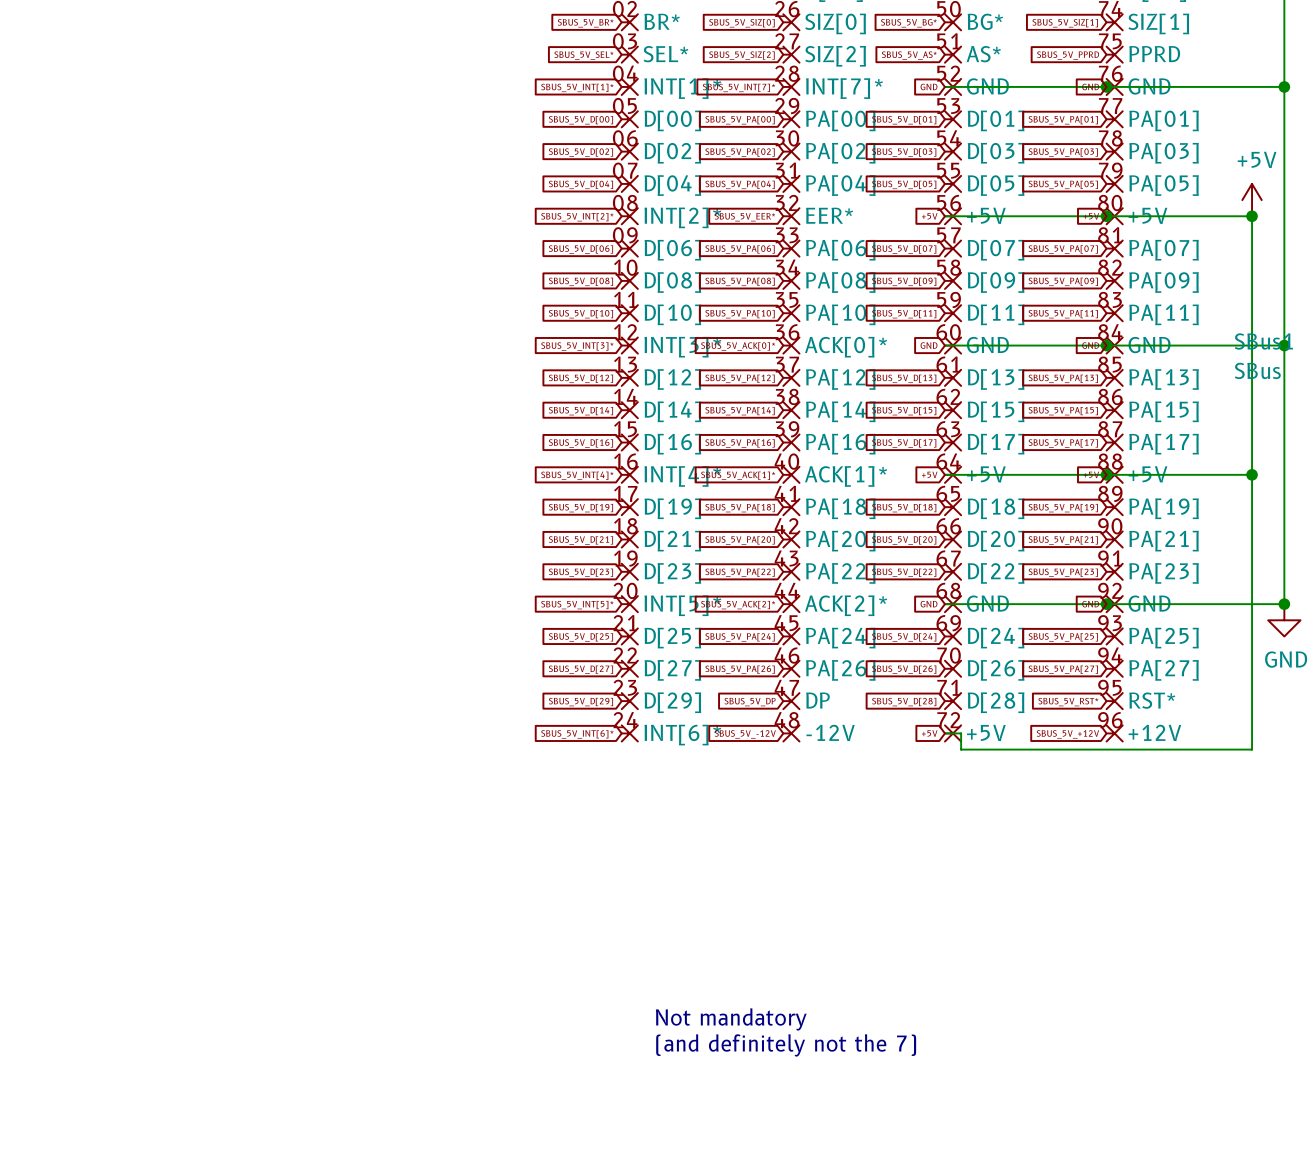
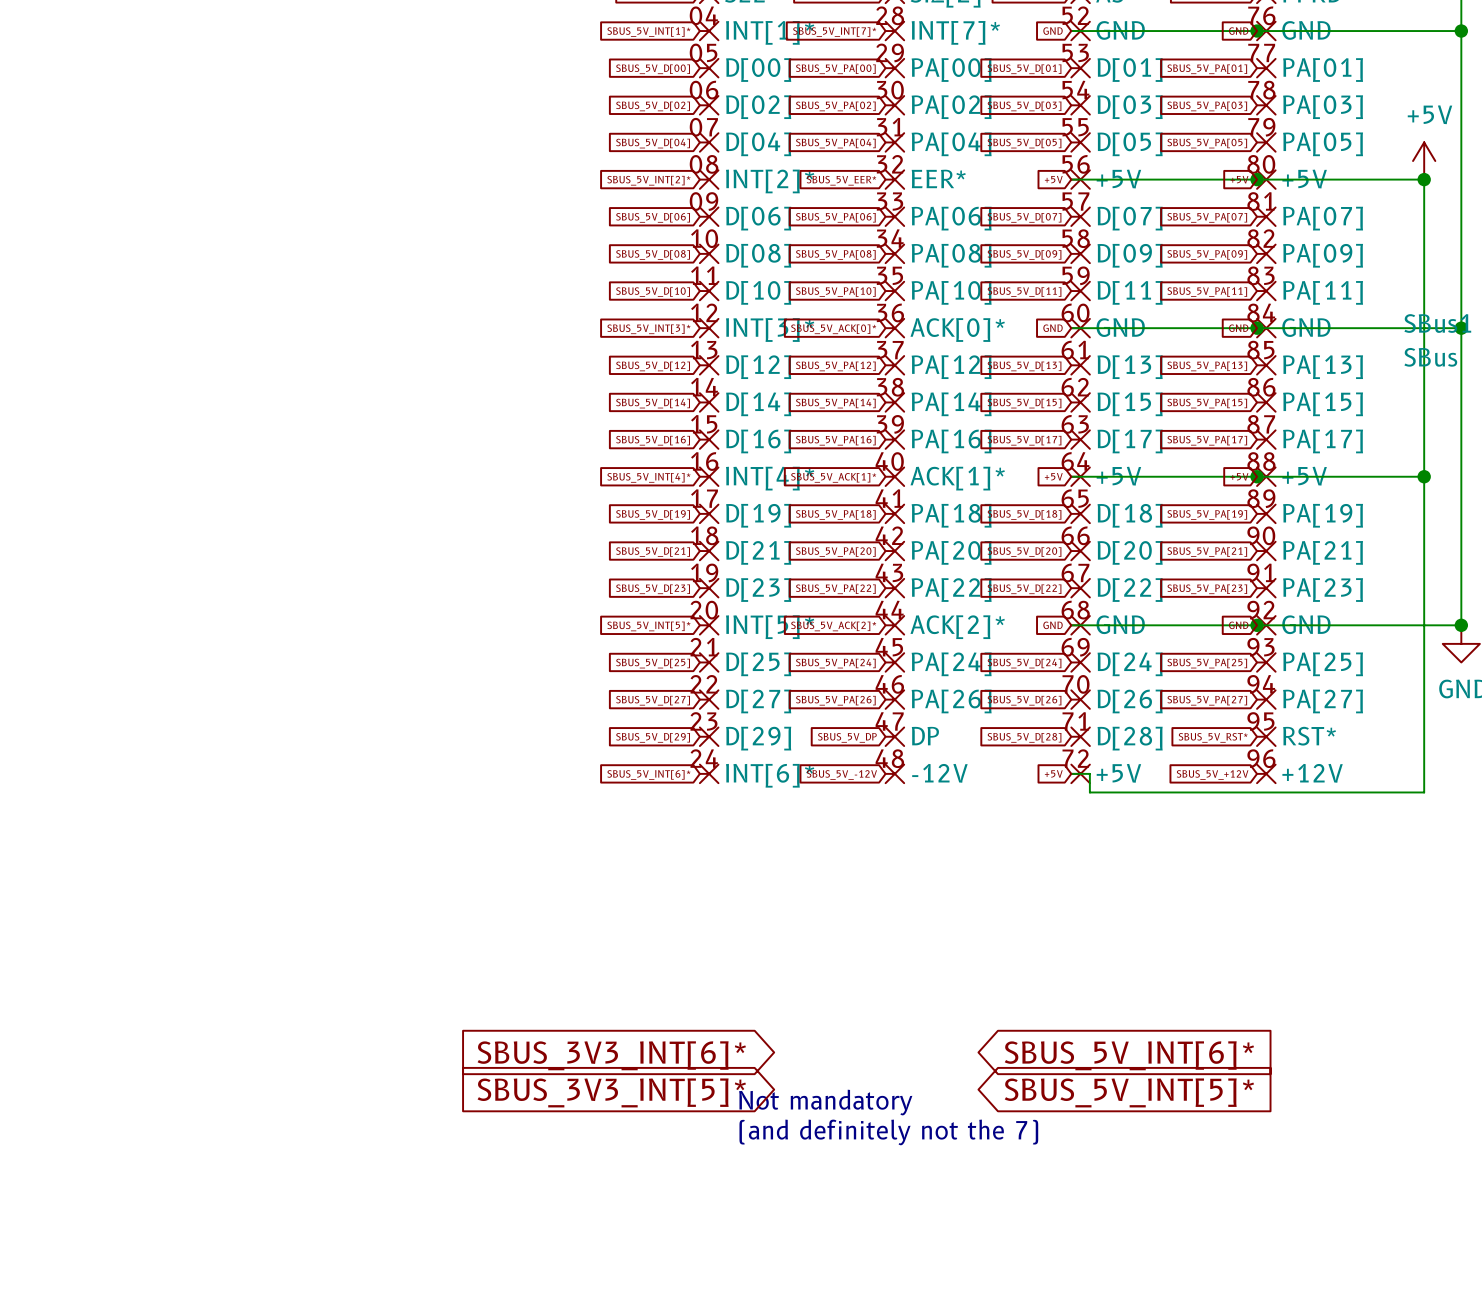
global label: none -> SBUS_3V3_INT[6]* (611, 1055)
global label: none -> SBUS_5V_INT[6]* (1129, 1055)
global label: none -> SBUS_3V3_INT[5]* (611, 1092)
global label: none -> SBUS_5V_INT[5]* (1129, 1092)

